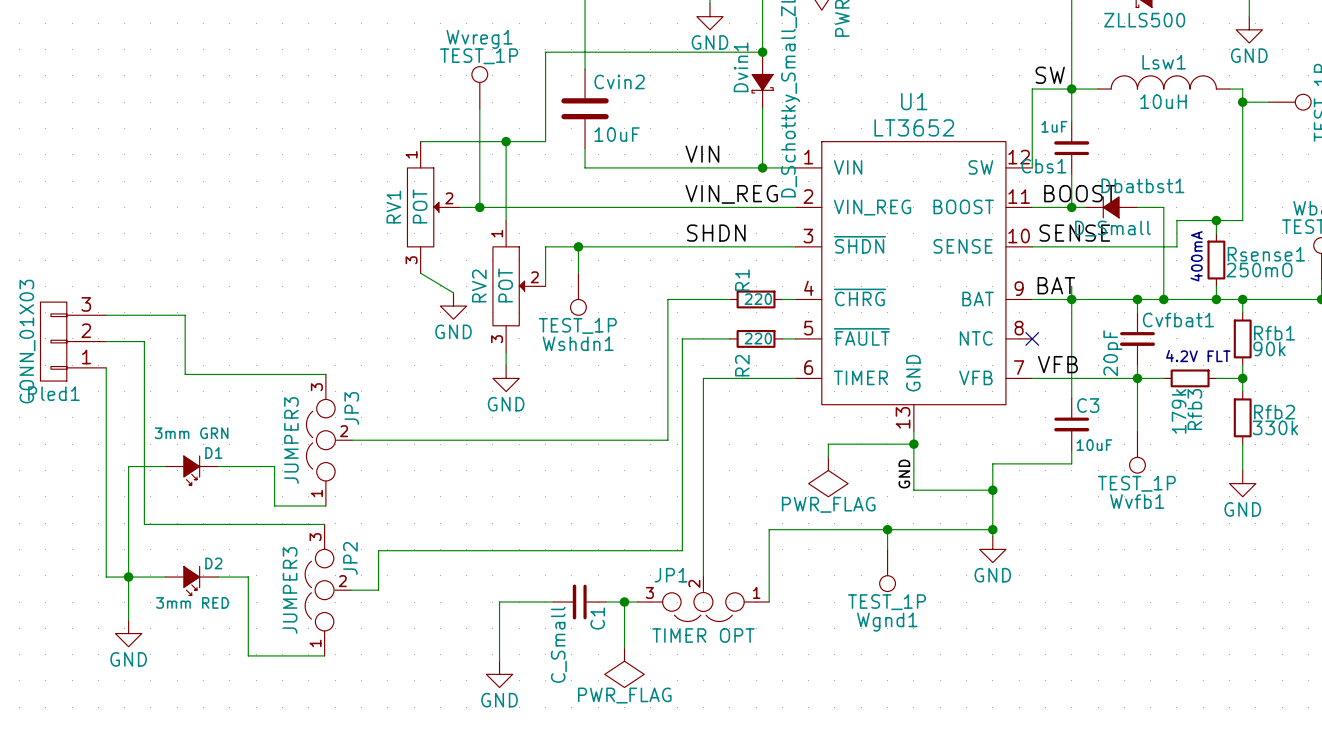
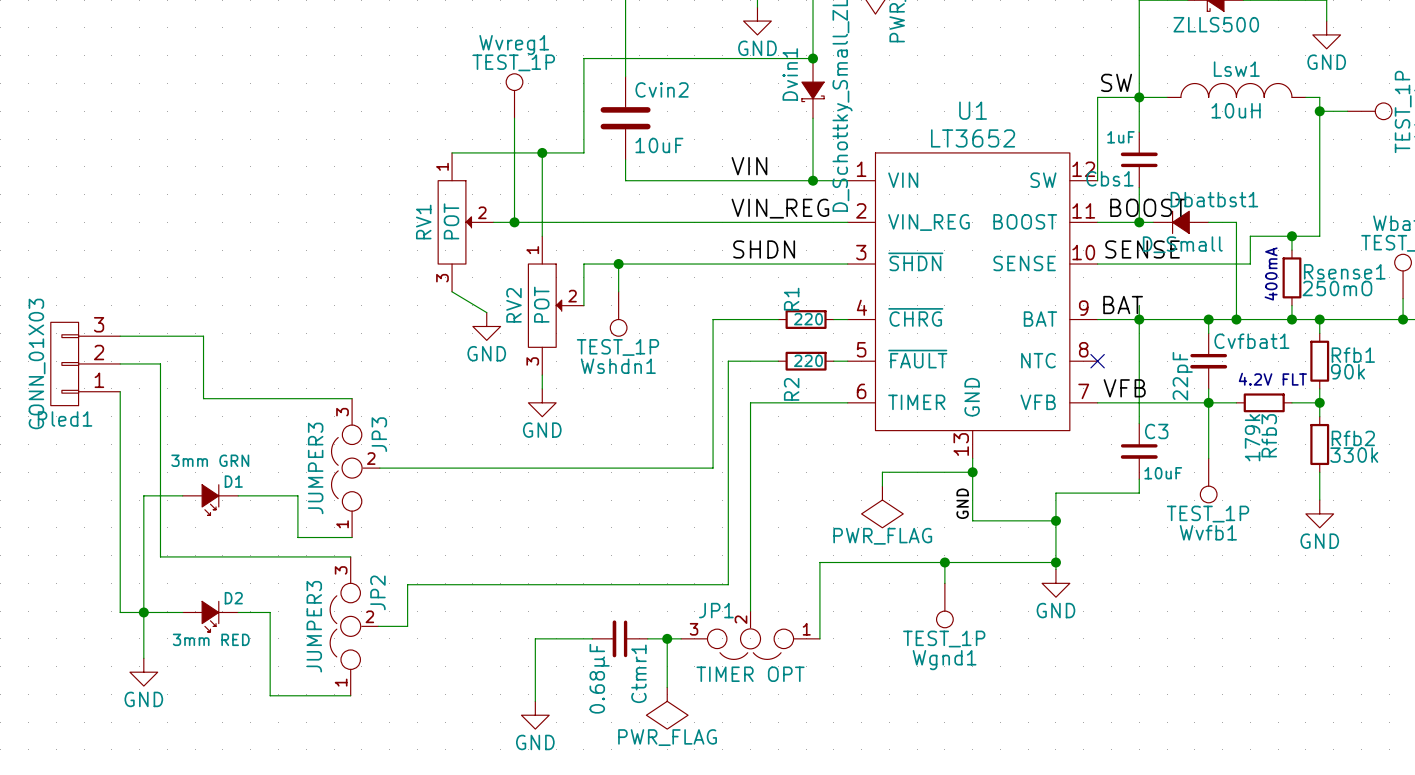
Cvfbat1 value: 20pF (1112, 353) -> 22pF (1182, 376)
C1 name: C1 (597, 618) -> Ctmr1 (638, 673)
C1 value: C_Small (558, 644) -> 0.68µF (599, 678)

